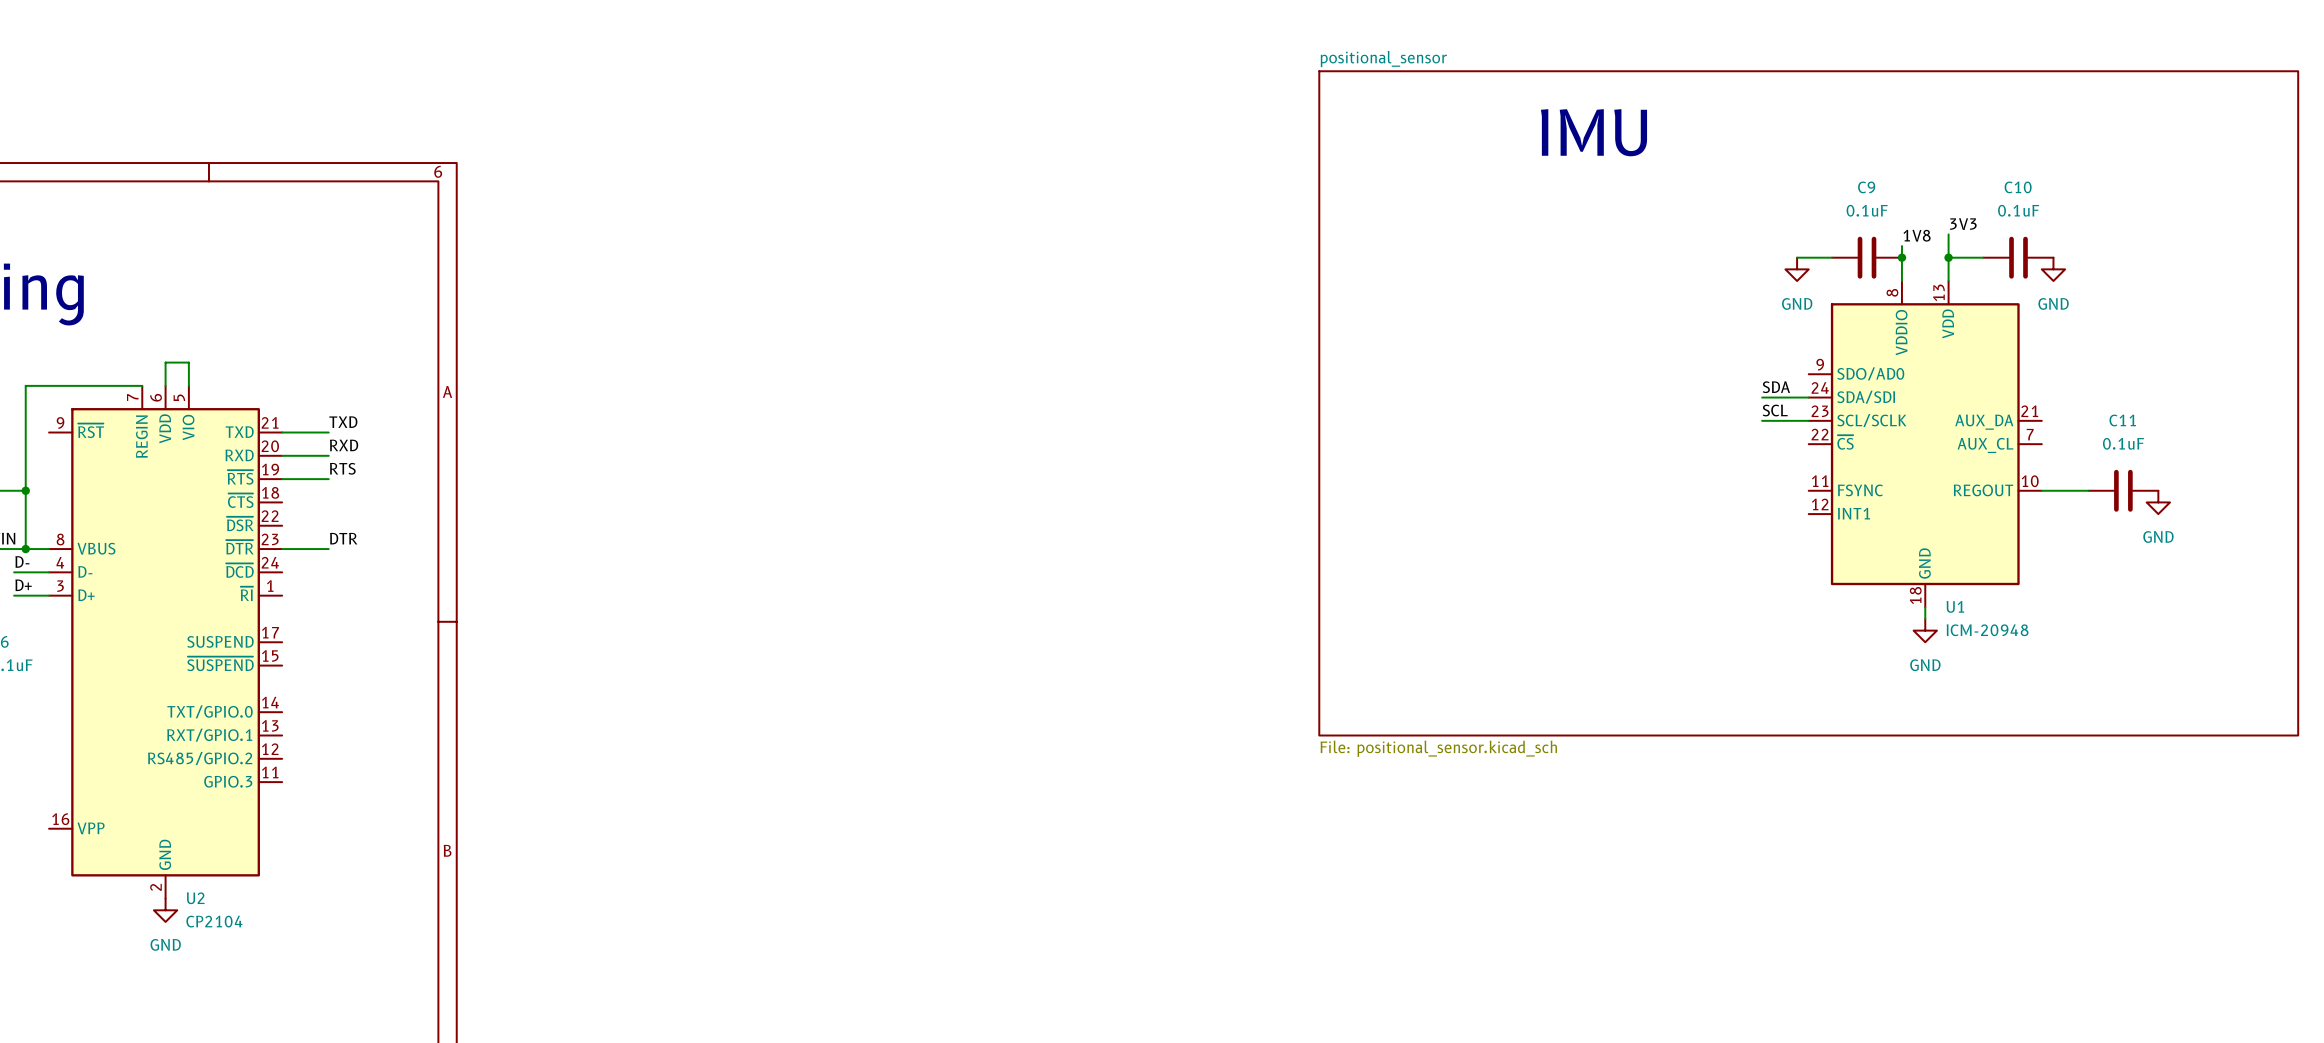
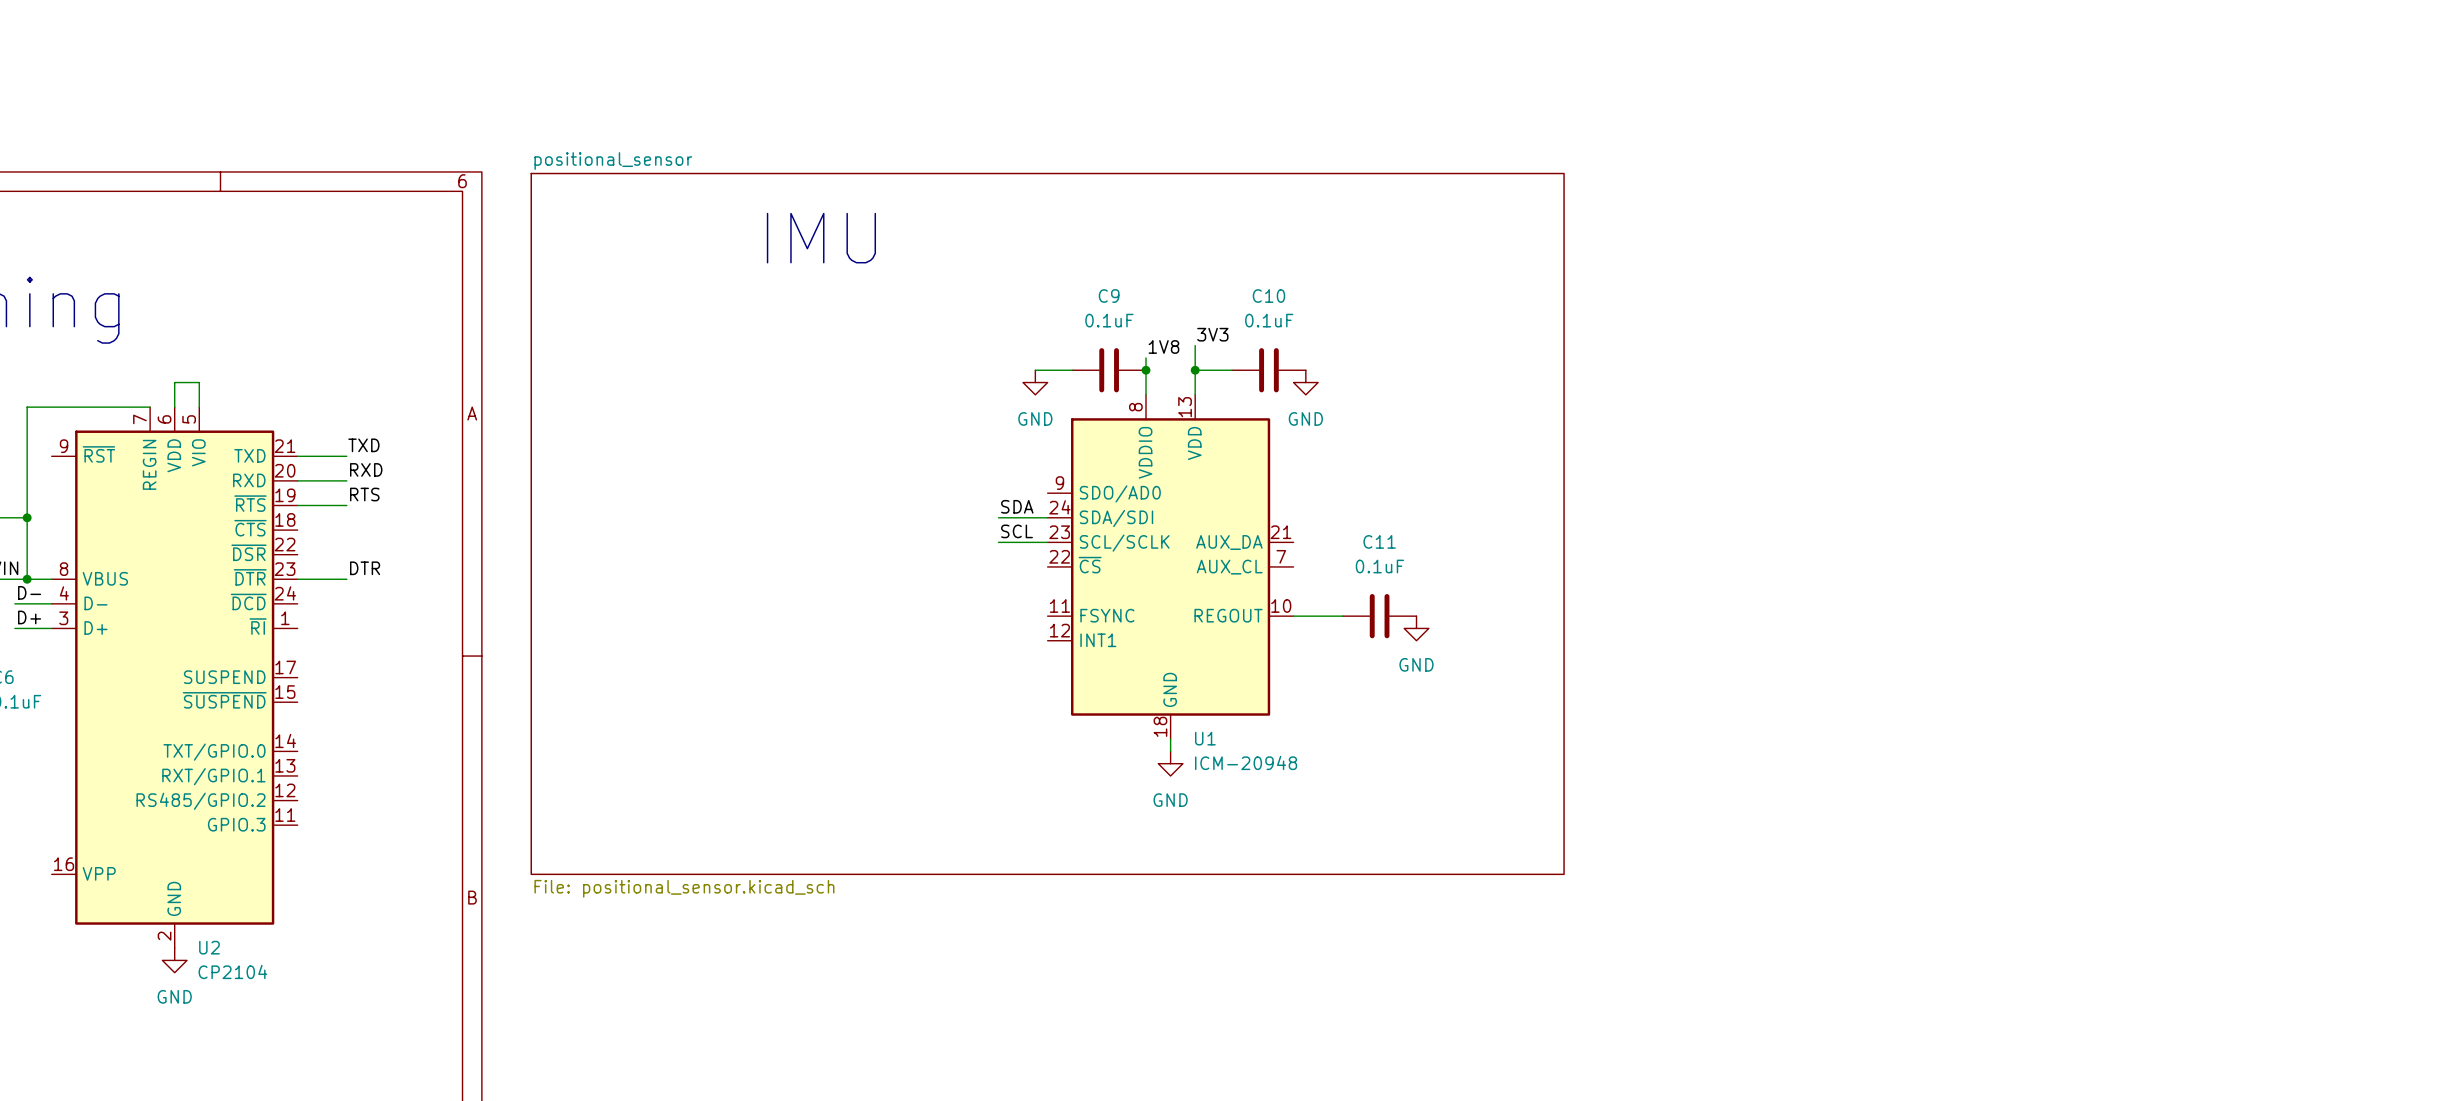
text: IMU (1594, 132) -> none
label: 3V3 (1963, 224) -> none
text: none -> IMU (821, 238)
wire: (1948, 234) (1948, 281) -> none
label: 1V8 (1917, 235) -> none
wire: (1901, 246) (1901, 281) -> none
wire: (1797, 257) (1832, 257) -> none
C9 position: (1867, 257) -> (1109, 370)
junction: (1901, 257) -> none
wire: (1948, 257) (1983, 257) -> none
junction: (1948, 257) -> none
C10 position: (2018, 257) -> (1268, 370)
power symbol: GND (1797, 269) -> none
power symbol: GND (2053, 269) -> none
label: none -> 3V3 (1212, 334)
wire: none -> (1195, 345) (1195, 394)
label: none -> 1V8 (1163, 346)
wire: none -> (1146, 357) (1146, 394)
wire: none -> (1035, 370) (1072, 370)
junction: none -> (1146, 370)
wire: none -> (1195, 370) (1232, 370)
junction: none -> (1195, 370)
power symbol: none -> GND (1035, 382)
power symbol: none -> GND (1305, 382)
label: SDA (1776, 387) -> none
wire: (1762, 397) (1808, 397) -> none
sheet positional_sensor: File: positional_sensor.kicad_sch (1808, 403) -> none
label: SCL (1775, 410) -> none
wire: (1762, 420) (1808, 420) -> none
U1 position: (1925, 444) -> (1170, 566)
label: none -> SDA (1017, 506)
wire: none -> (998, 517) (1047, 517)
wire: (2041, 490) (2088, 490) -> none
C11 position: (2123, 490) -> (1379, 616)
sheet positional_sensor: none -> File: positional_sensor.kicad_sch (1047, 523)
power symbol: GND (2158, 502) -> none
label: none -> SCL (1017, 531)
wire: none -> (998, 542) (1047, 542)
wire: none -> (1293, 616) (1342, 616)
power symbol: none -> GND (1416, 628)
wire: (1925, 607) (1925, 618) -> none
power symbol: GND (1925, 630) -> none
wire: none -> (1170, 739) (1170, 751)
power symbol: none -> GND (1170, 763)

